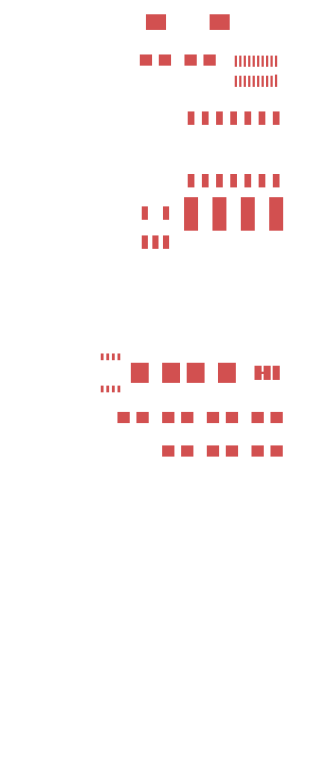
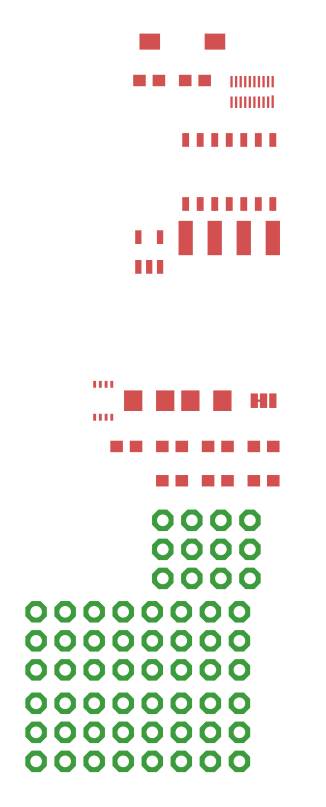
part: none -> (206, 549)
part: none -> (137, 640)
part: none -> (137, 732)

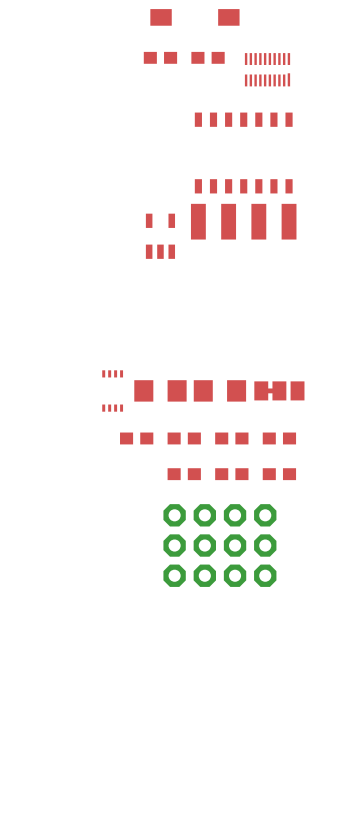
part footprint: [250, 393, 277, 408] -> [254, 381, 305, 401]
part: (137, 640) -> none
part: (137, 732) -> none

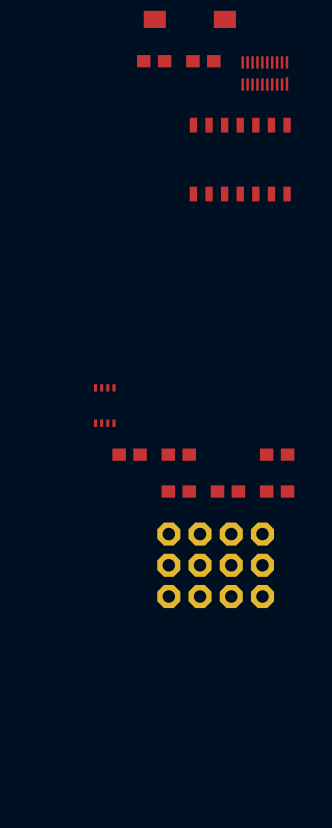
part: (243, 221) -> none
part: (160, 236) -> none
part: (160, 390) -> none
part: (219, 390) -> none
part: (279, 390) -> none
part: (231, 438) -> none

